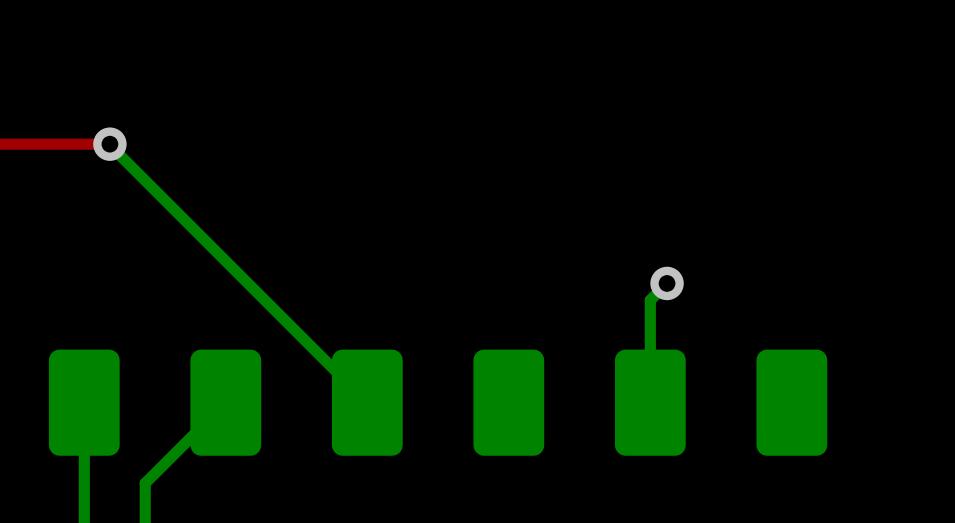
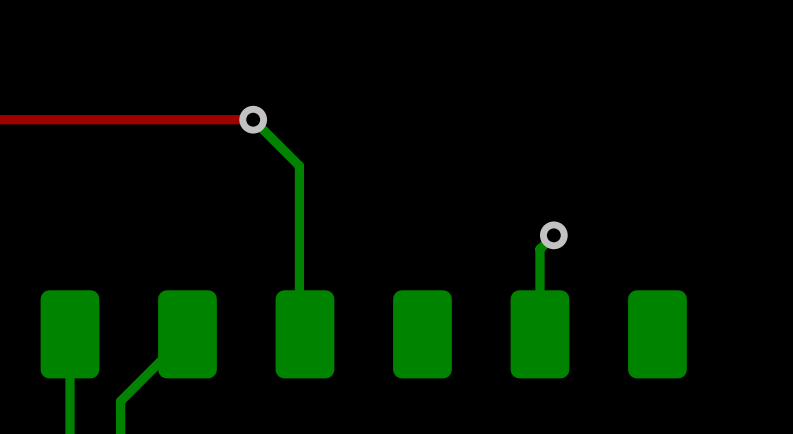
top track: none -> (91, 119) (253, 119)
via position: (109, 144) -> (253, 119)
bottom track: (109, 145) (360, 396) -> (253, 119) (299, 165) (299, 328)

